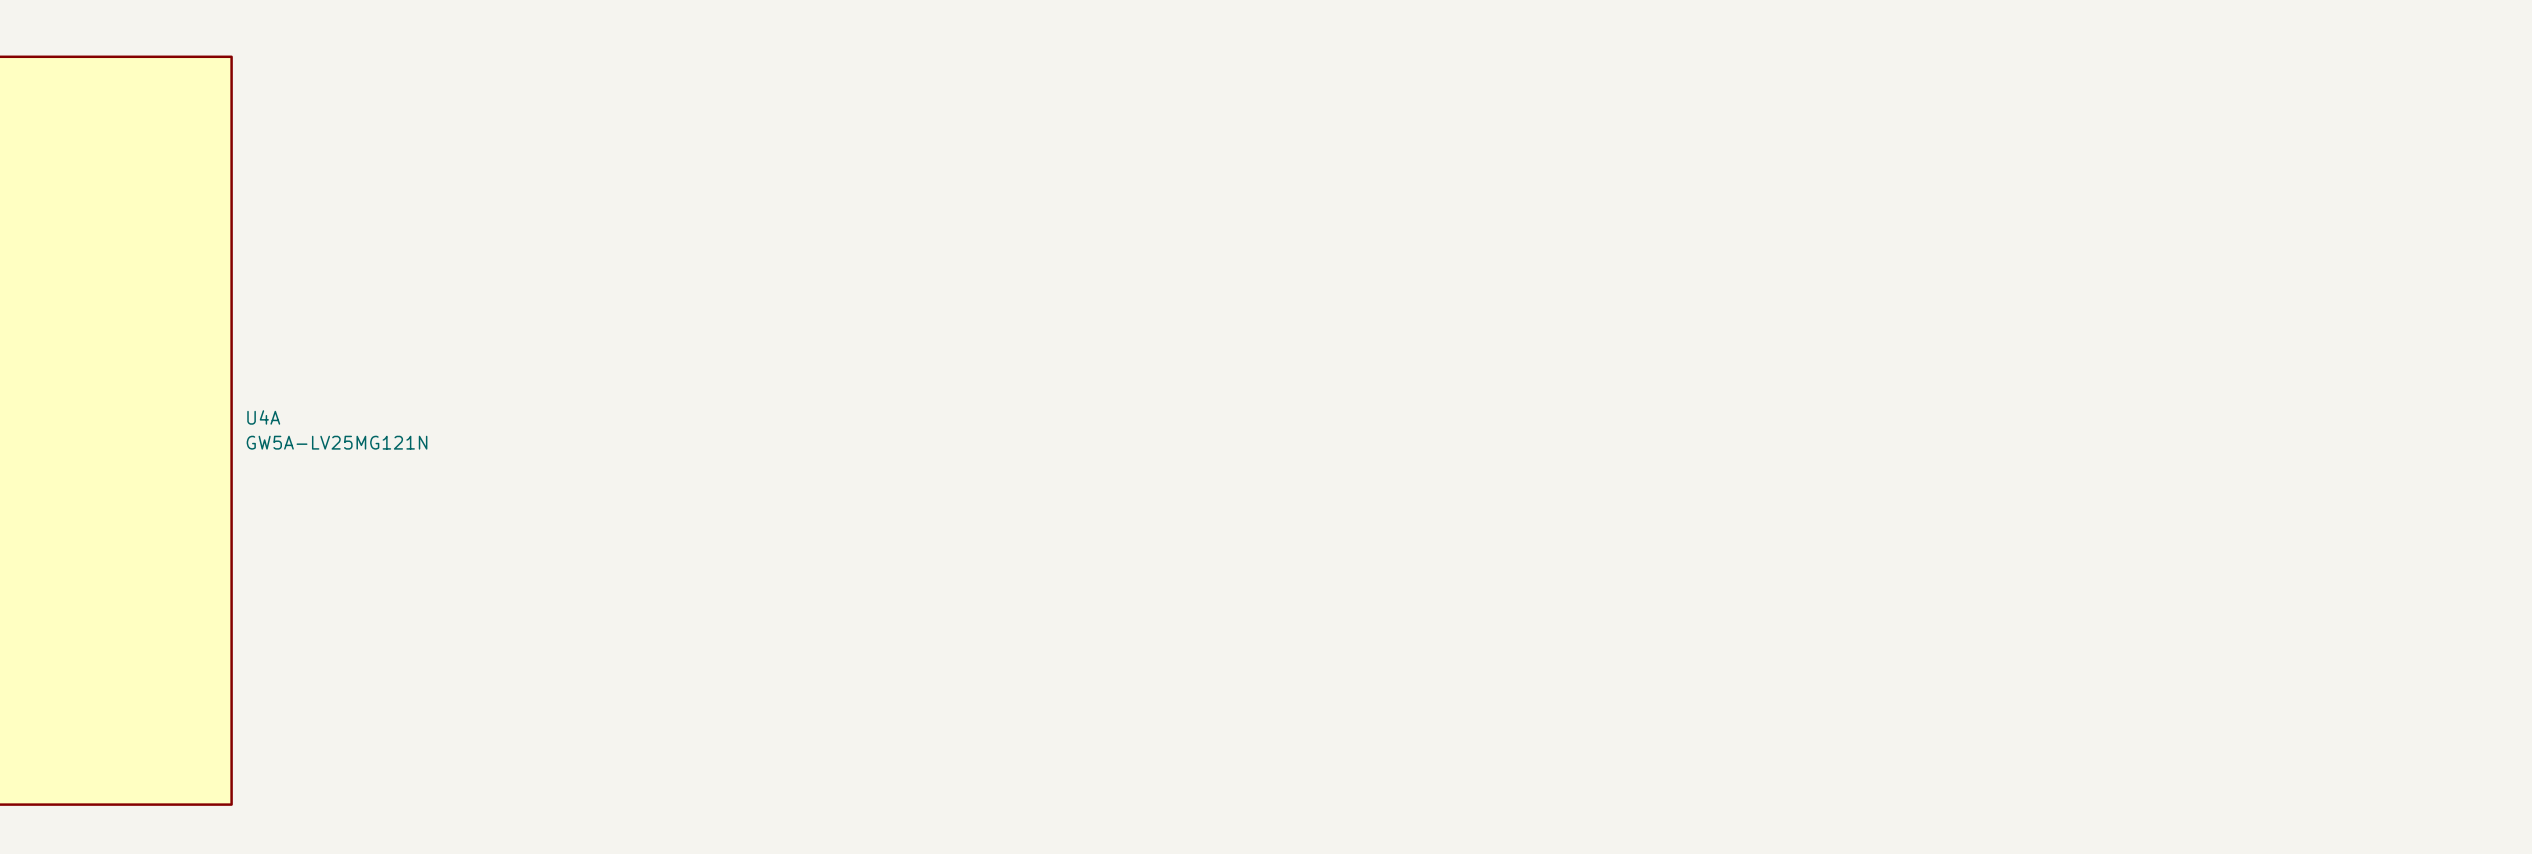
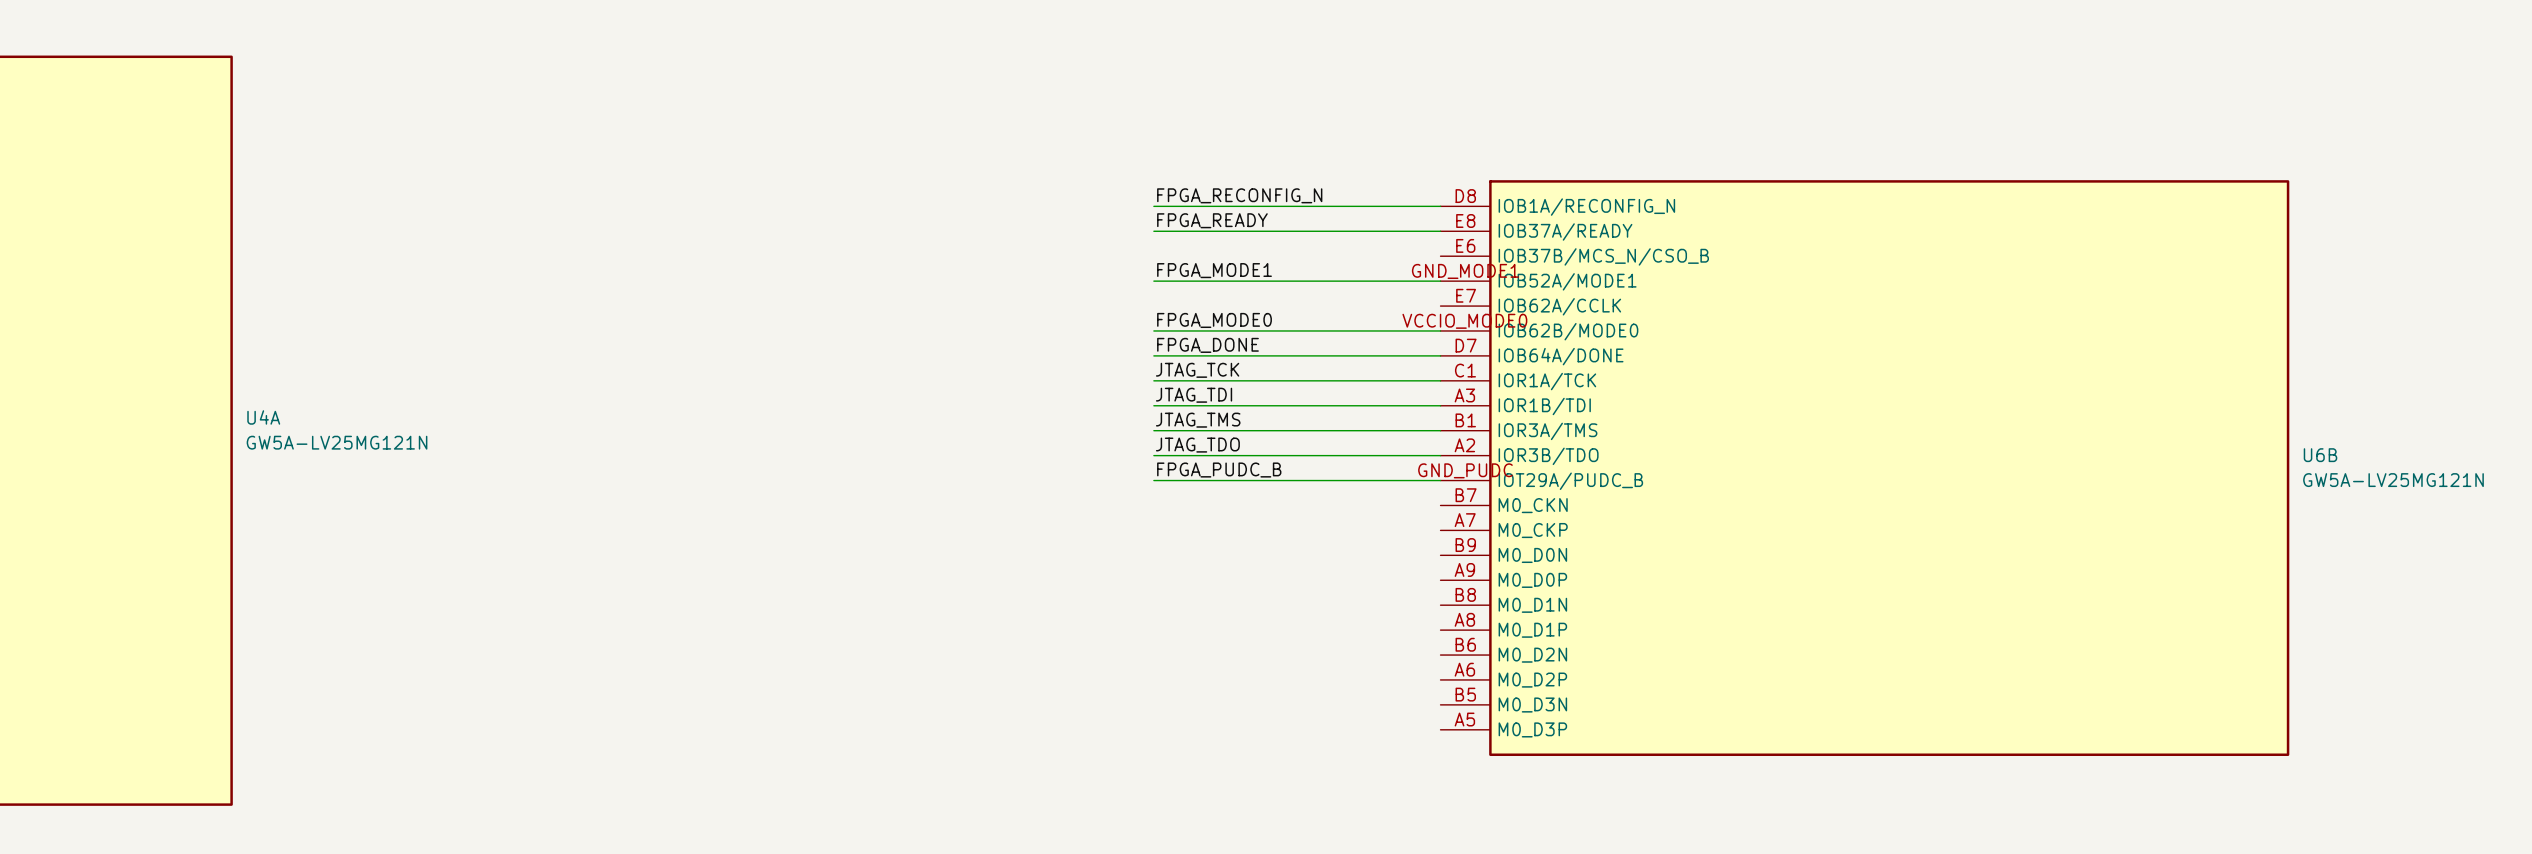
label: none -> FPGA_RECONFIG_N (1239, 195)
wire: none -> (1153, 206) (1440, 206)
label: none -> FPGA_READY (1212, 220)
wire: none -> (1153, 231) (1440, 231)
label: none -> FPGA_MODE1 (1214, 270)
wire: none -> (1153, 281) (1440, 281)
label: none -> FPGA_MODE0 (1214, 320)
wire: none -> (1153, 330) (1440, 330)
label: none -> FPGA_DONE (1207, 345)
wire: none -> (1153, 355) (1440, 355)
label: none -> JTAG_TCK (1197, 370)
wire: none -> (1153, 380) (1440, 380)
label: none -> JTAG_TDI (1194, 395)
wire: none -> (1153, 405) (1440, 405)
label: none -> JTAG_TMS (1198, 420)
wire: none -> (1153, 430) (1440, 430)
label: none -> JTAG_TDO (1197, 445)
wire: none -> (1153, 455) (1440, 455)
U6B: none -> GW5A-LV25MG121N (1864, 468)
label: none -> FPGA_PUDC_B (1219, 470)
wire: none -> (1153, 480) (1440, 480)

